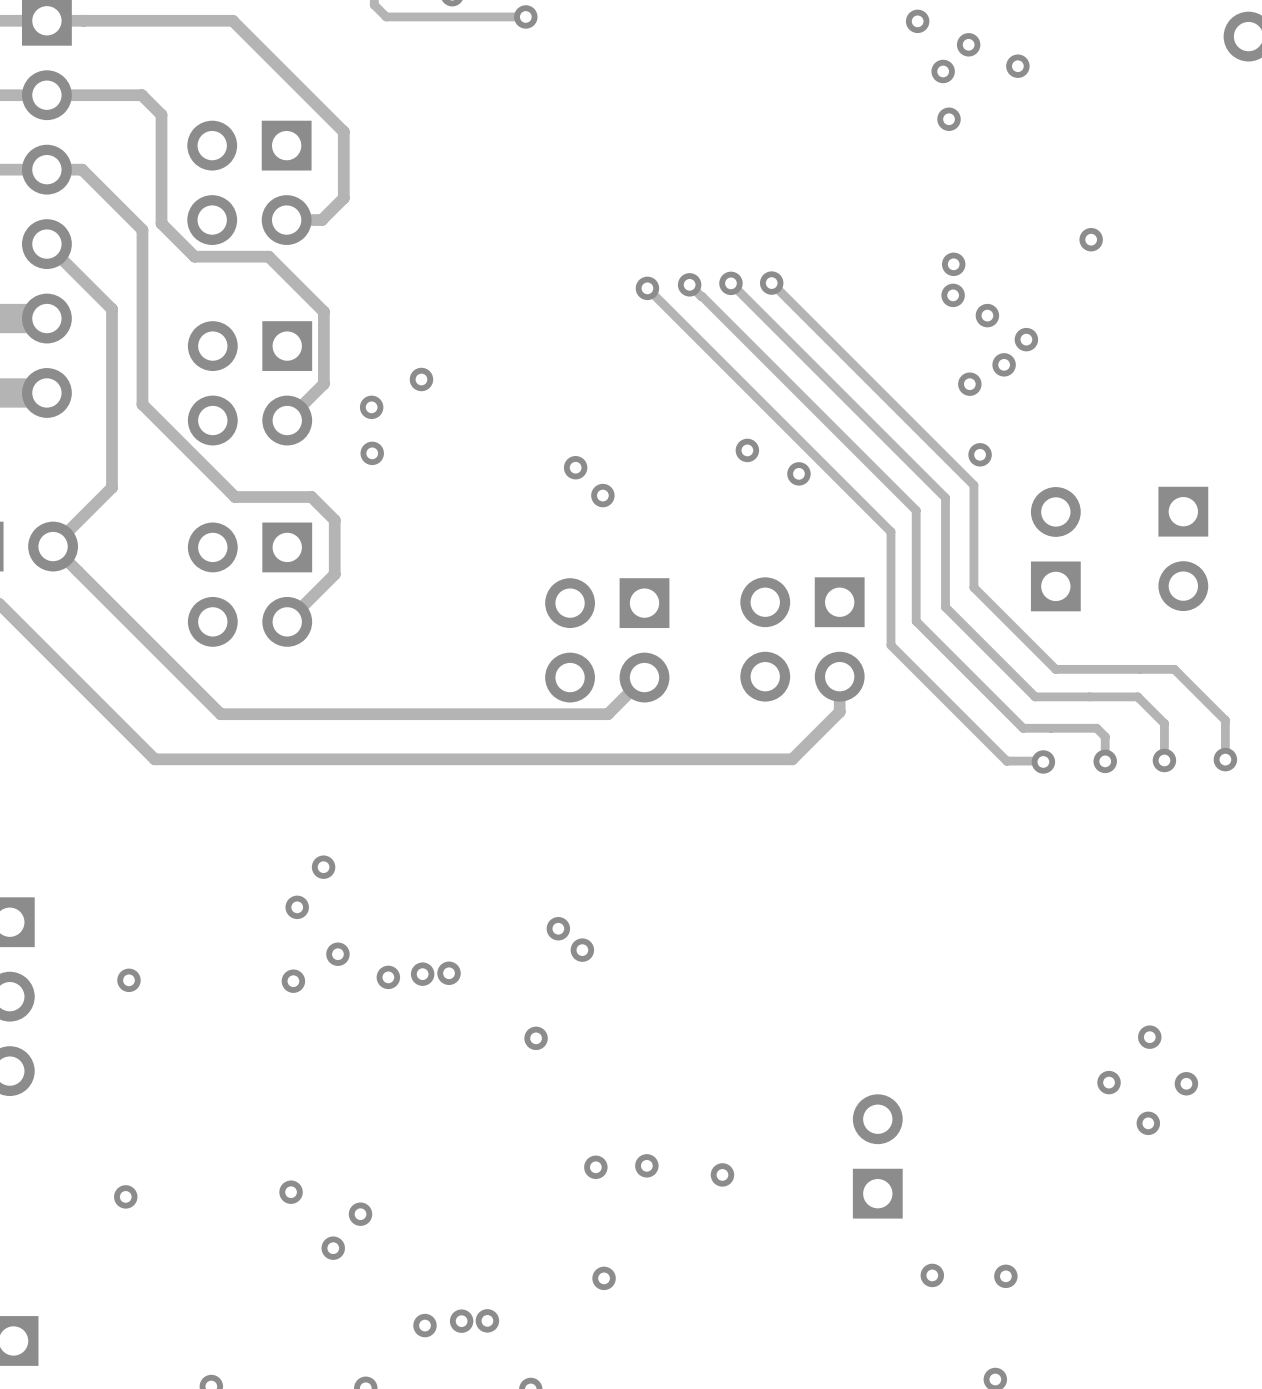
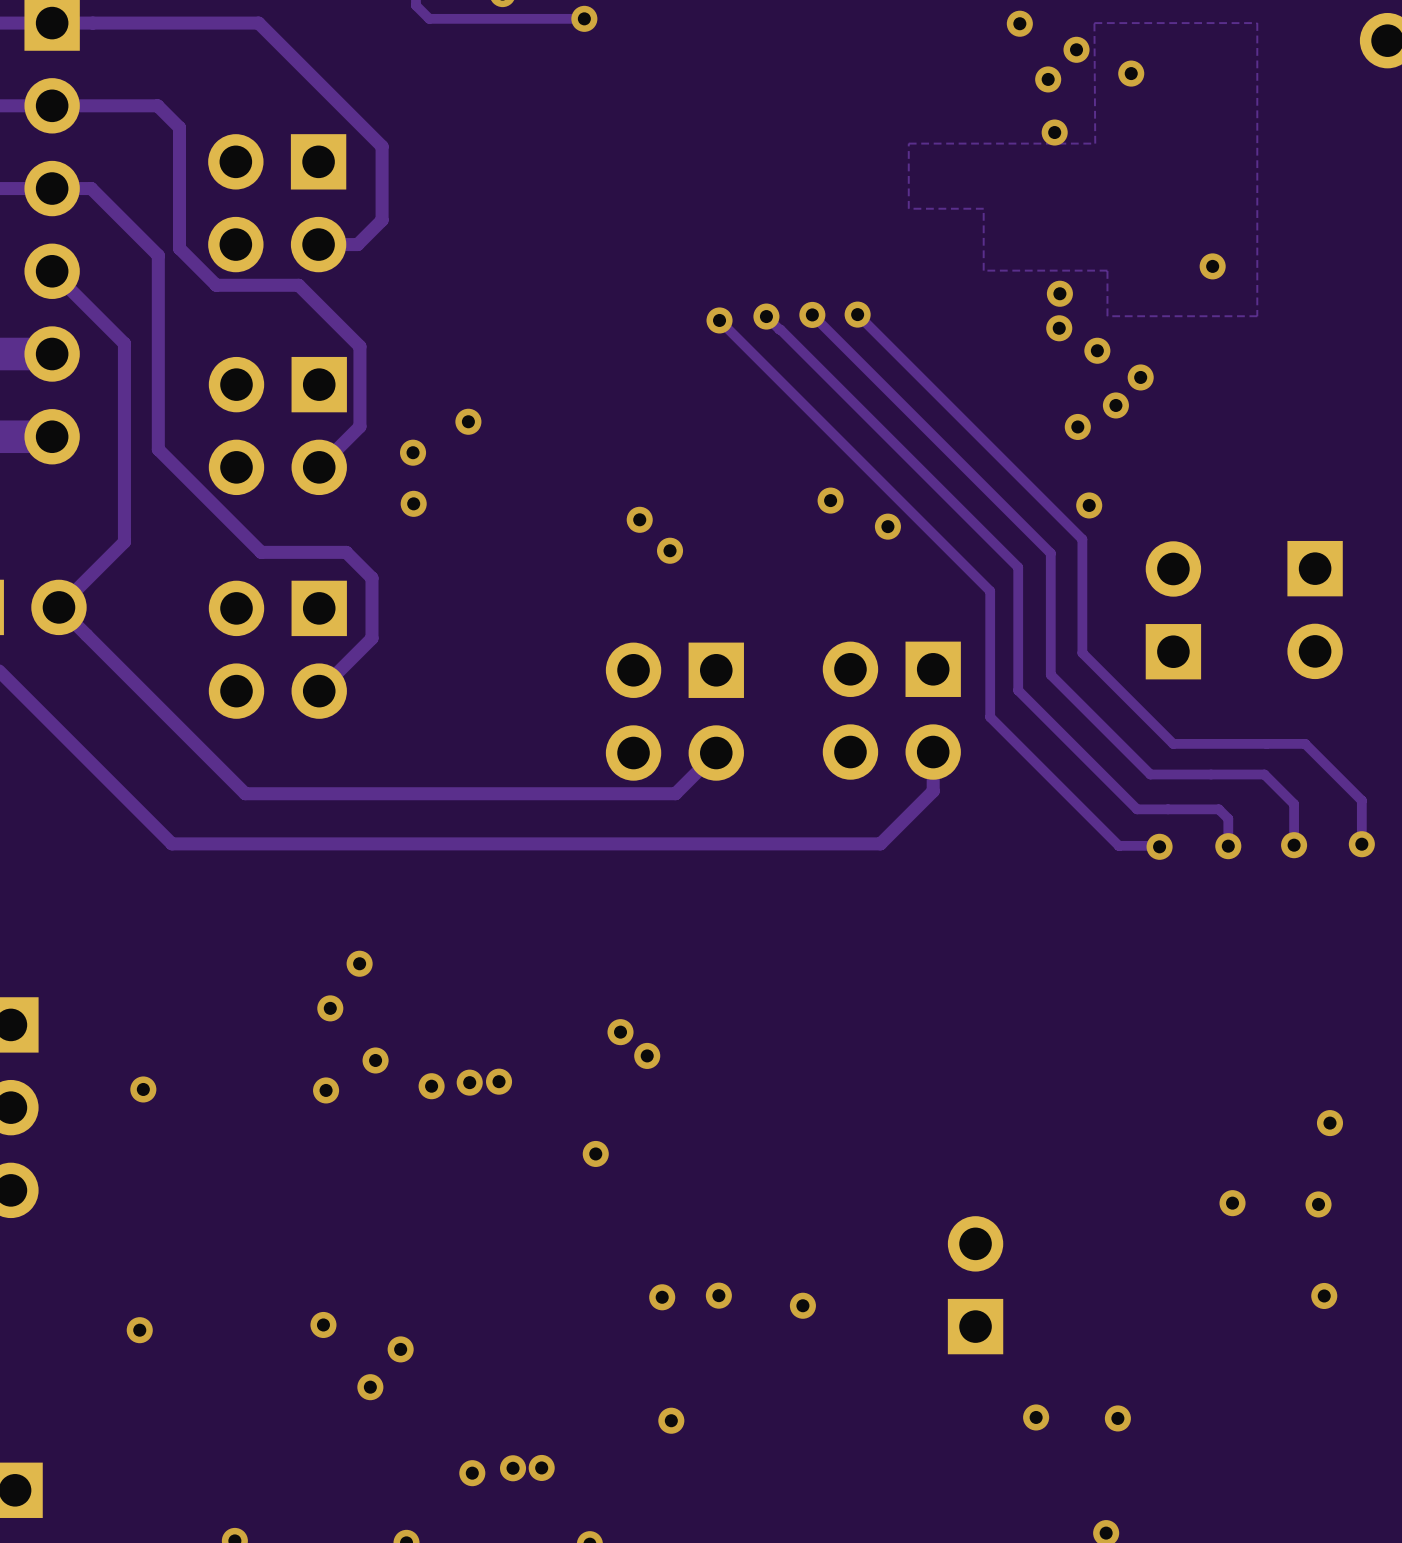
zone outline: none -> (1257, 23) (1094, 23) (1095, 143) (908, 143) (908, 208) (983, 208) (983, 270) (1107, 270) (1107, 316) (1257, 316) (1257, 23)
via position: (1149, 1037) -> (1329, 1123)
via position: (1148, 1123) -> (1324, 1295)

